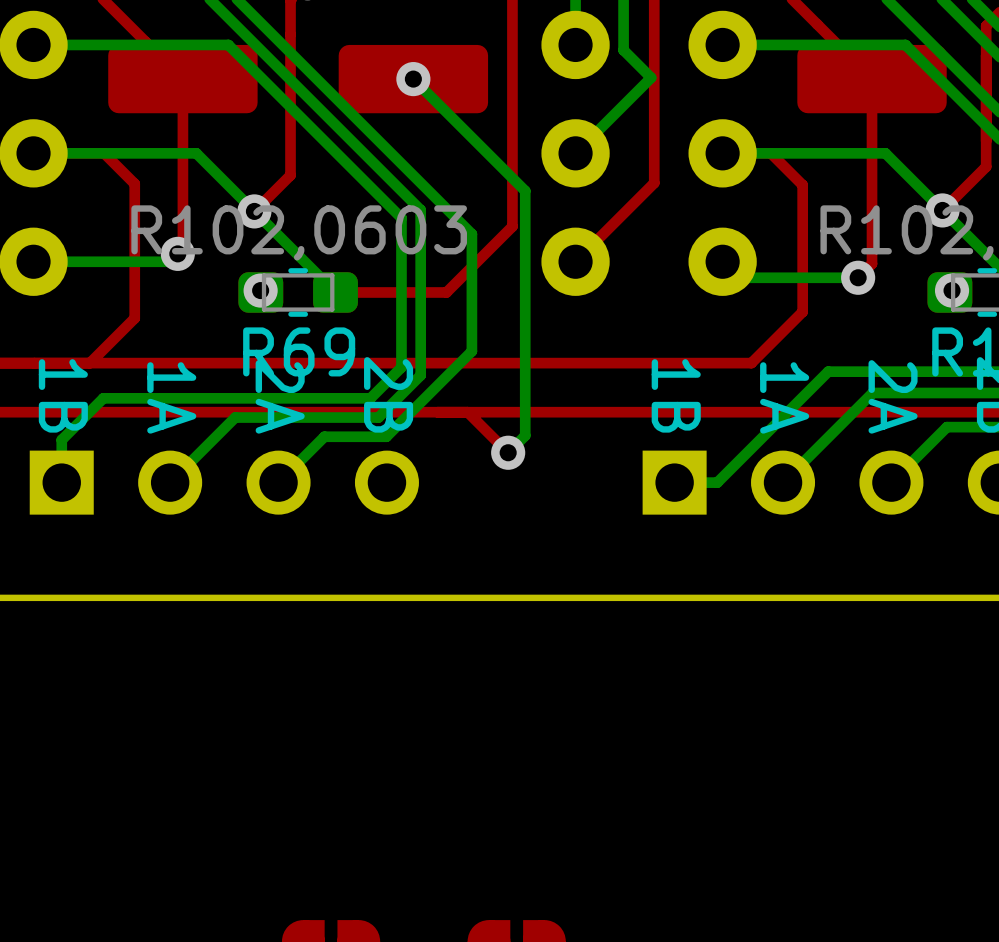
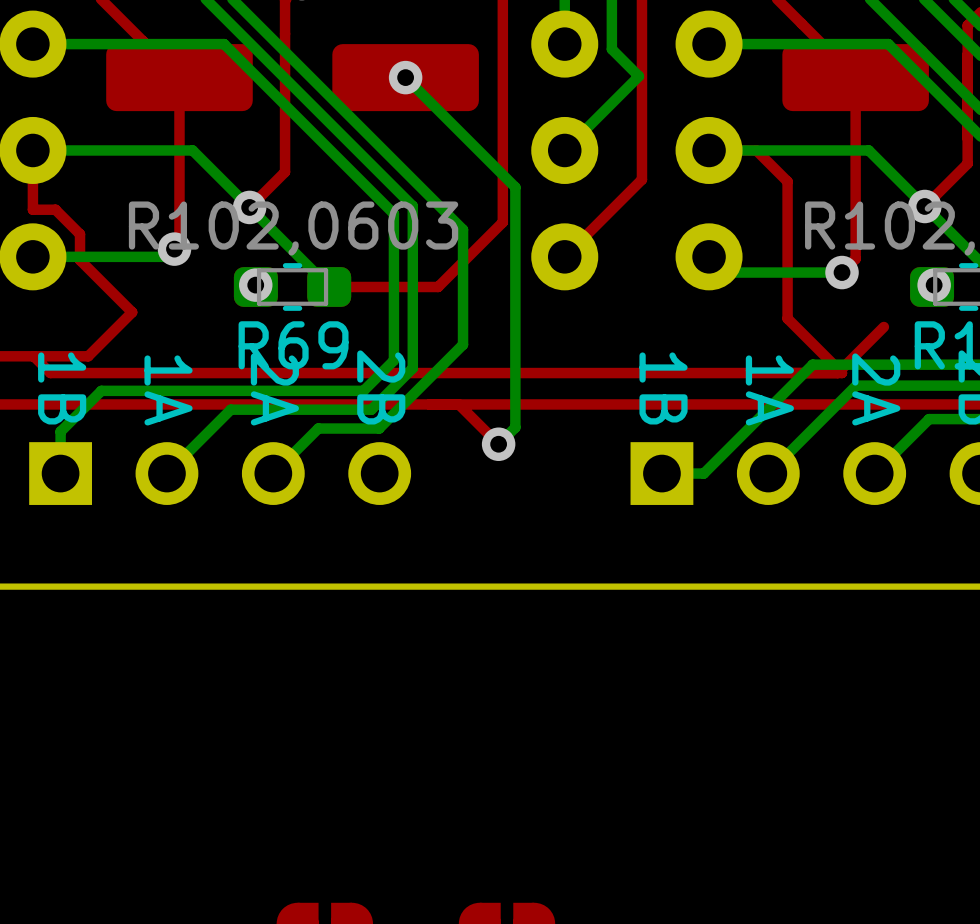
top track: (33, 153) (104, 153) (134, 183) (134, 318) -> (32, 150) (32, 209) (55, 209) (80, 234) (80, 260) (132, 312)
top track: (802, 311) (751, 363) (89, 363) -> (787, 306) (787, 318) (842, 373) (50, 373) (33, 356)
top track: none -> (883, 326) (837, 373)

